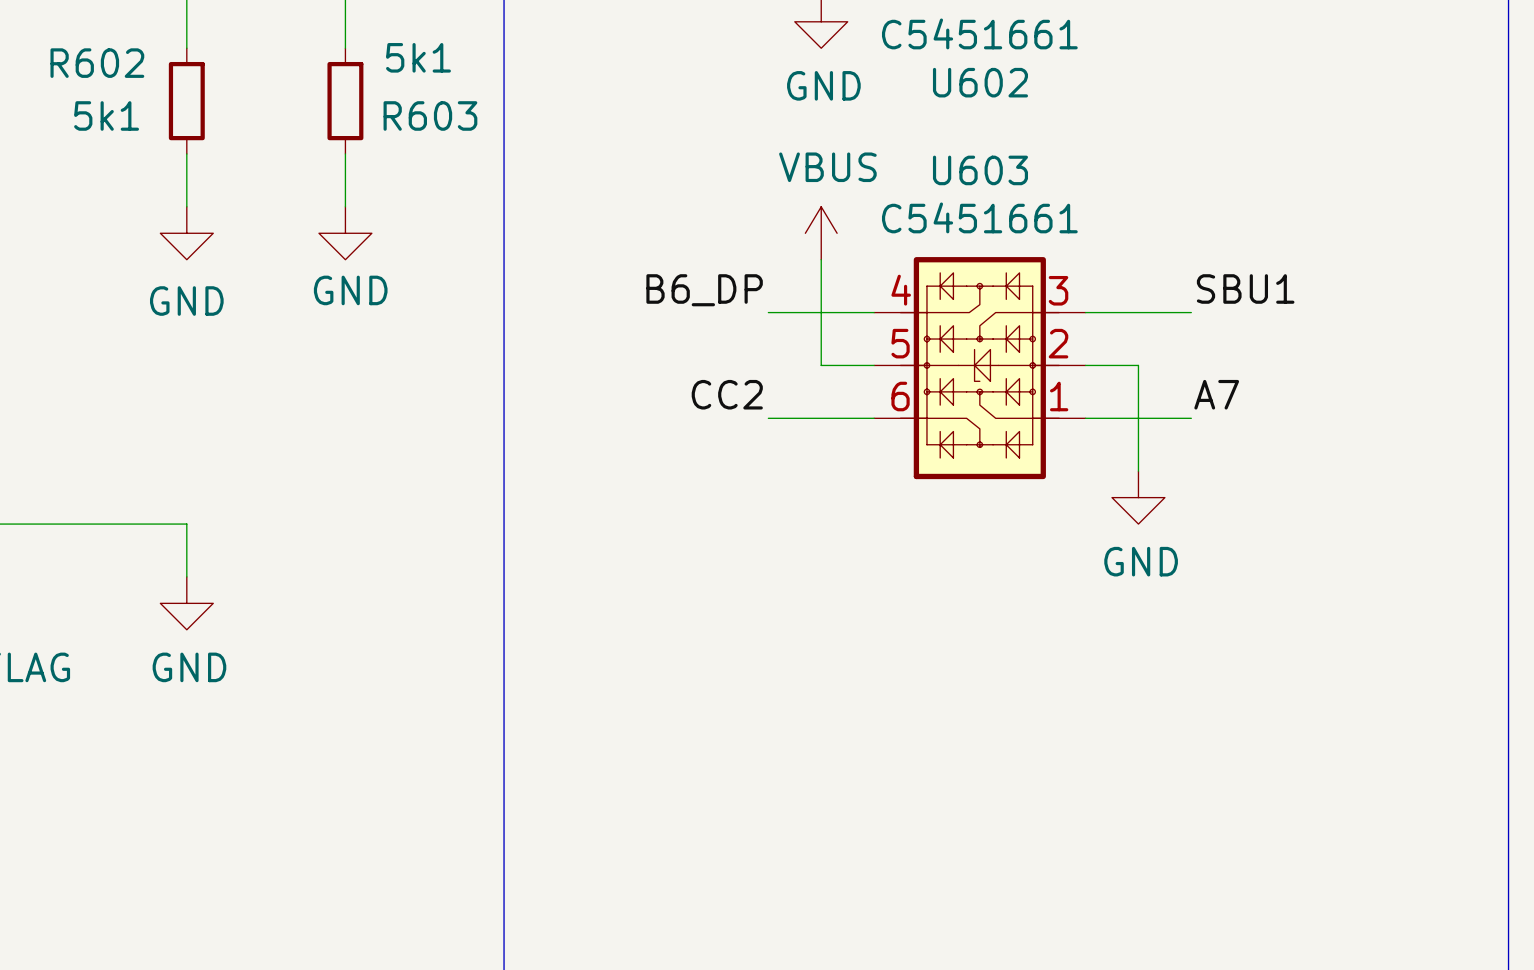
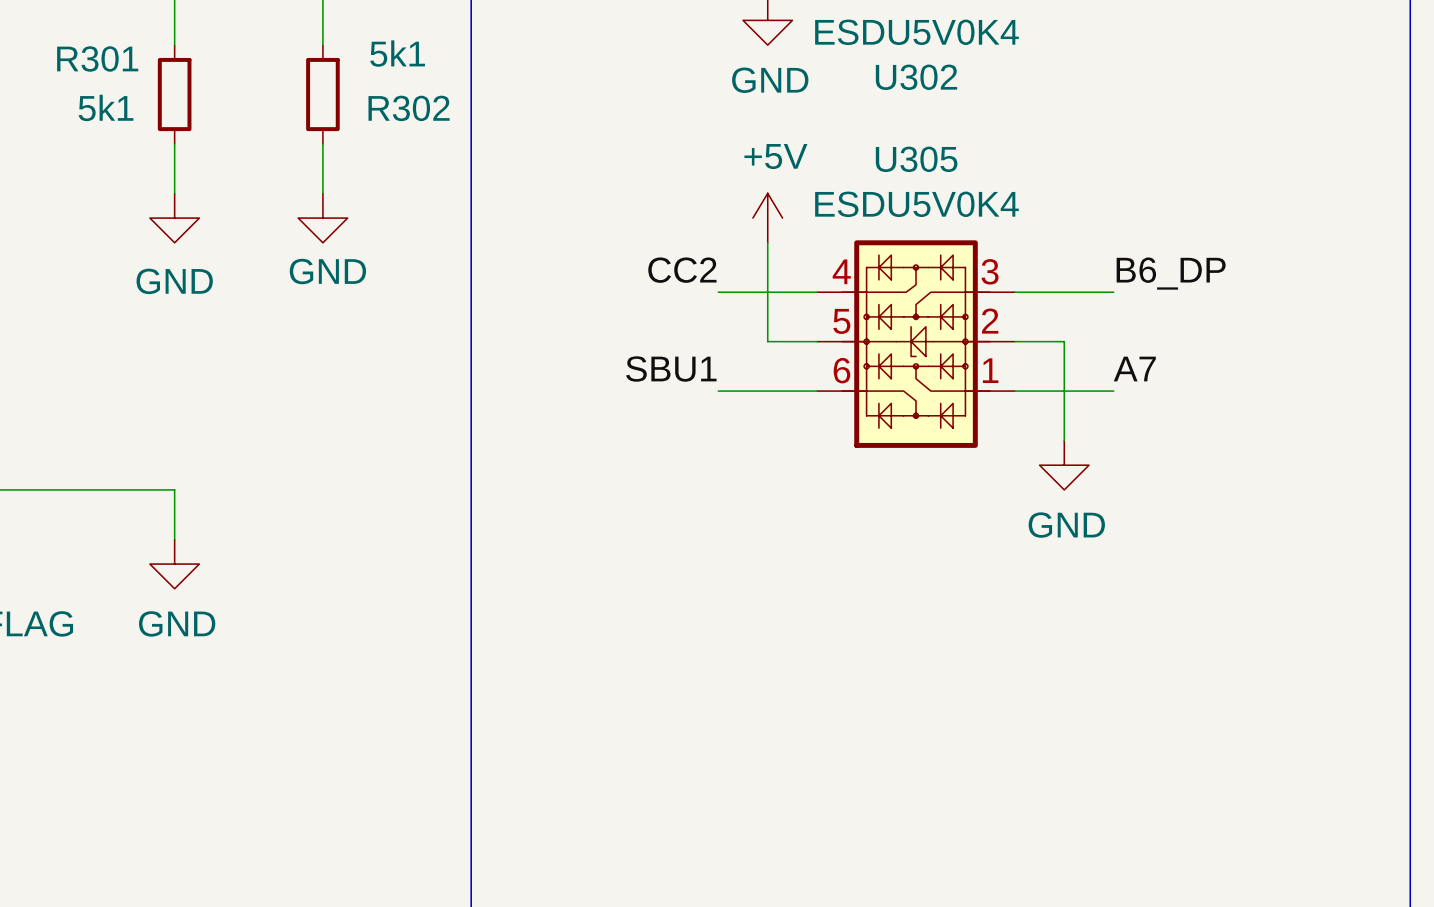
U602 value: C5451661 (979, 33) -> ESDU5V0K4 (916, 32)
R602 name: R602 (97, 63) -> R301 (97, 58)
U602 name: U602 (980, 82) -> U302 (916, 77)
R603 name: R603 (430, 115) -> R302 (409, 108)
U603 name: U603 (980, 170) -> U305 (916, 159)
U603 value: C5451661 (979, 217) -> ESDU5V0K4 (916, 204)
power symbol: VBUS (821, 233) -> +5V (767, 218)
label: SBU1 (1245, 288) -> B6_DP (1171, 273)
label: B6_DP (704, 290) -> CC2 (682, 270)
label: CC2 (727, 394) -> SBU1 (671, 369)

